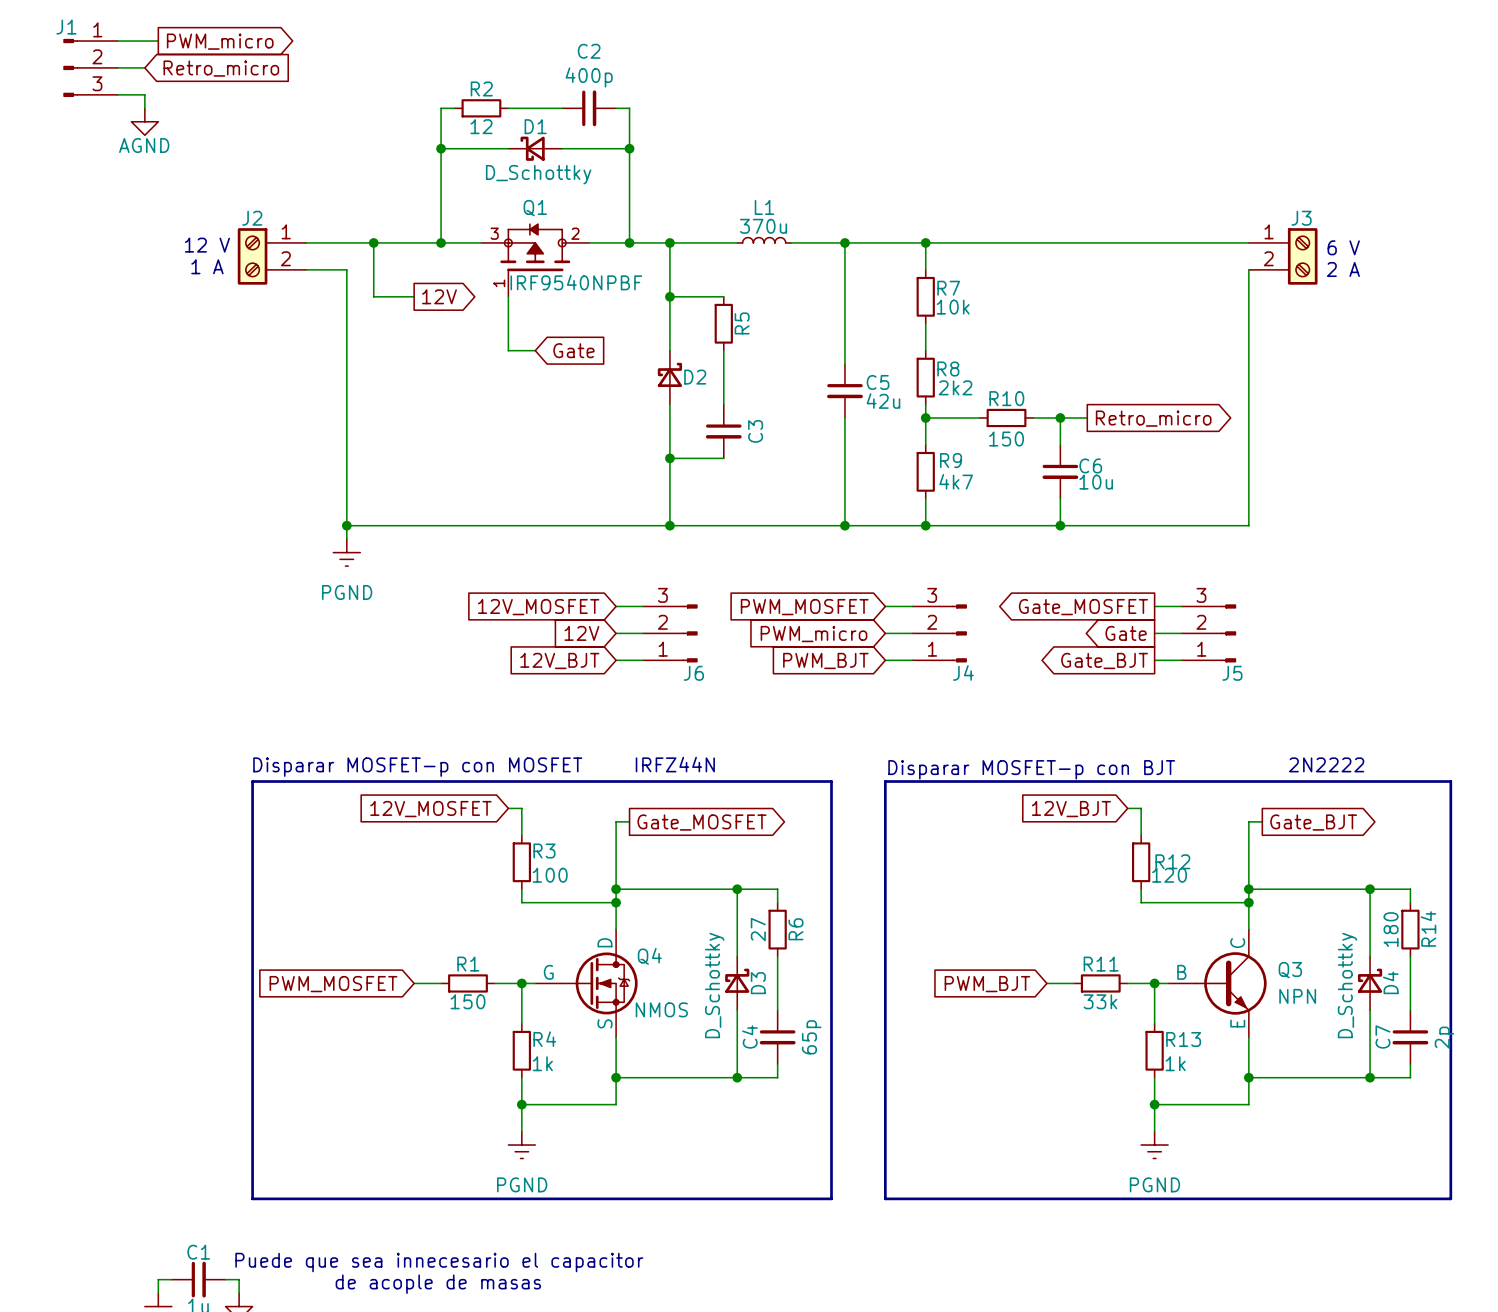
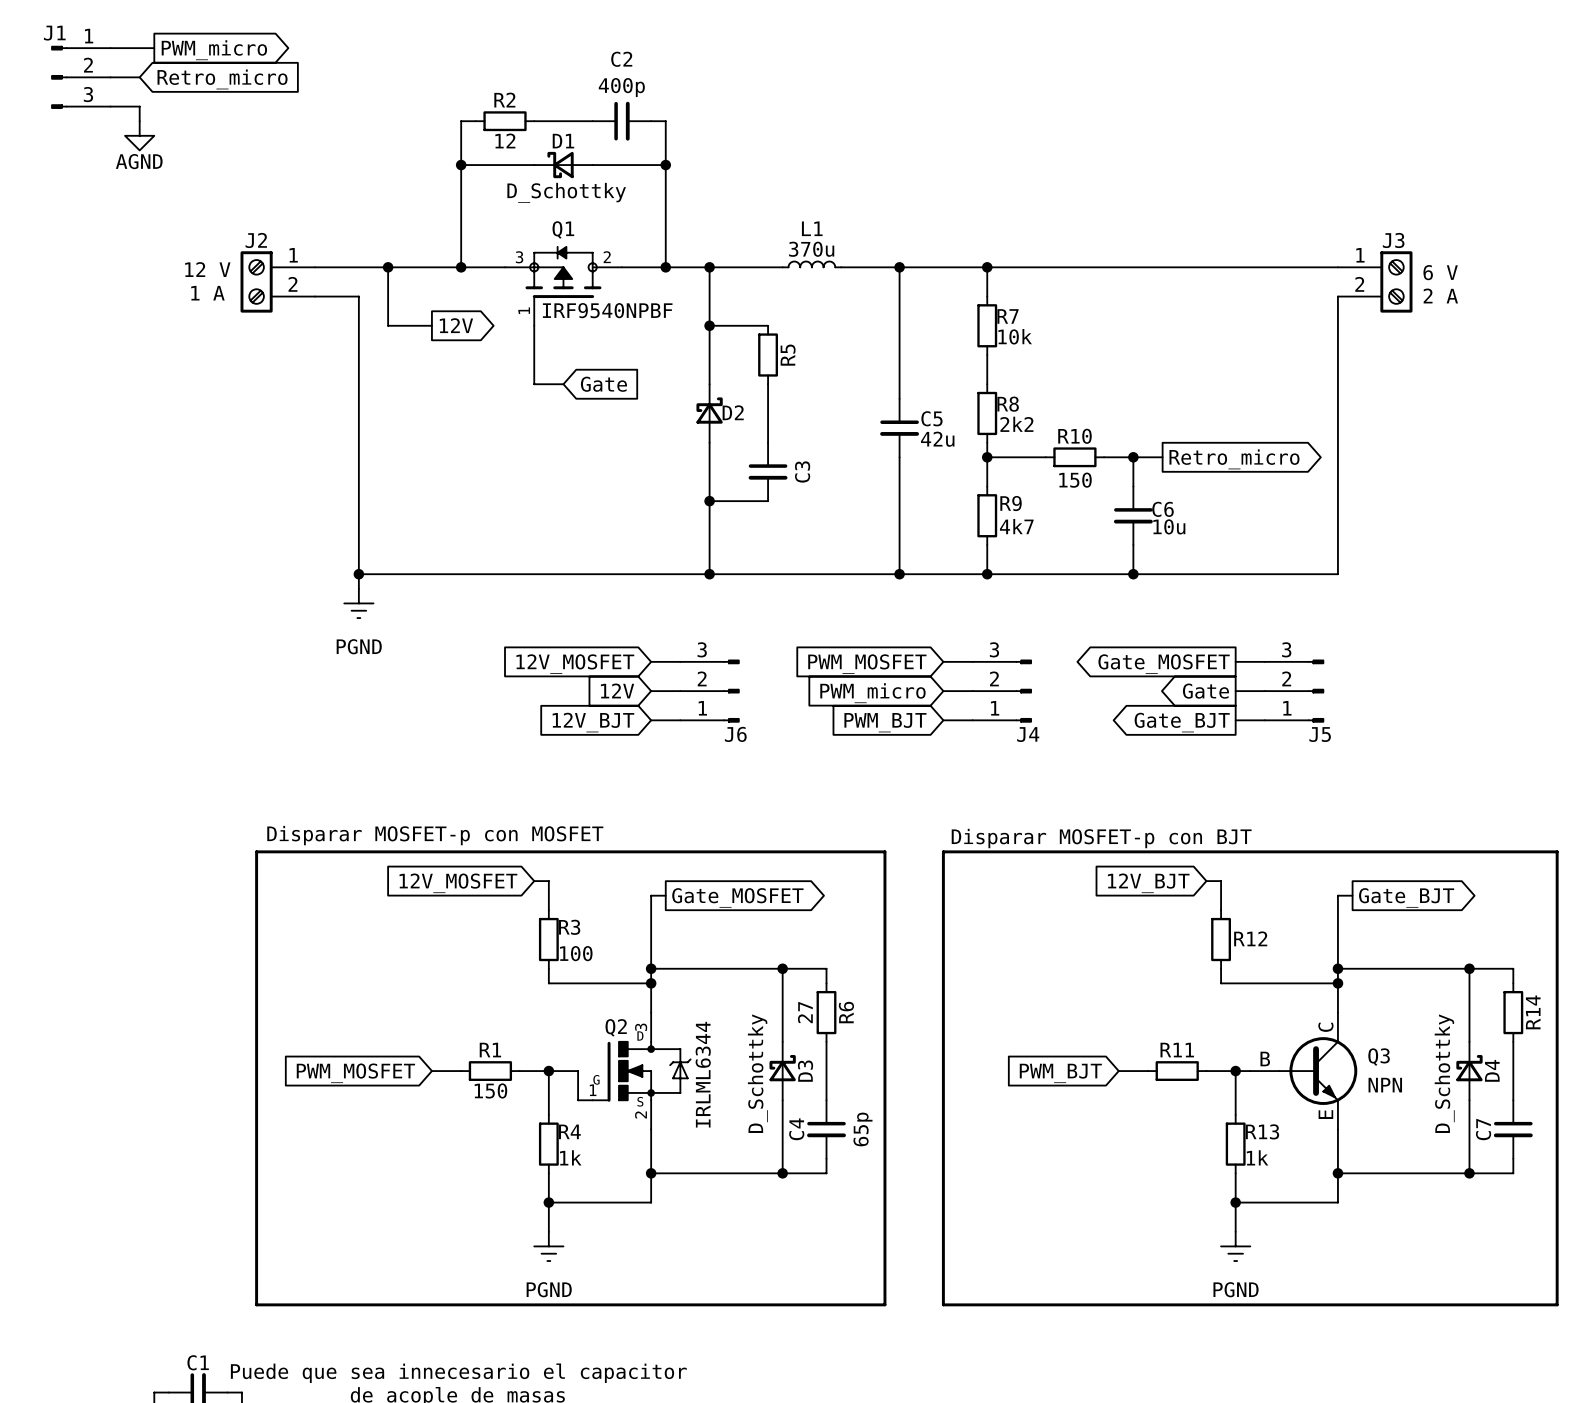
text: IRFZ44N (675, 764) -> none
text: 2N2222 (1326, 764) -> none
R12 value: 120 (1169, 875) -> none
R14 value: 180 (1391, 929) -> none
wire: none -> (563, 1071) (578, 1071) (578, 1100) (592, 1100)
Q4: NMOS (586, 983) -> none
Q2: none -> IRLML6344 (641, 1071)
R11 value: 33k (1100, 1001) -> none
C7 value: 2p (1444, 1037) -> none

